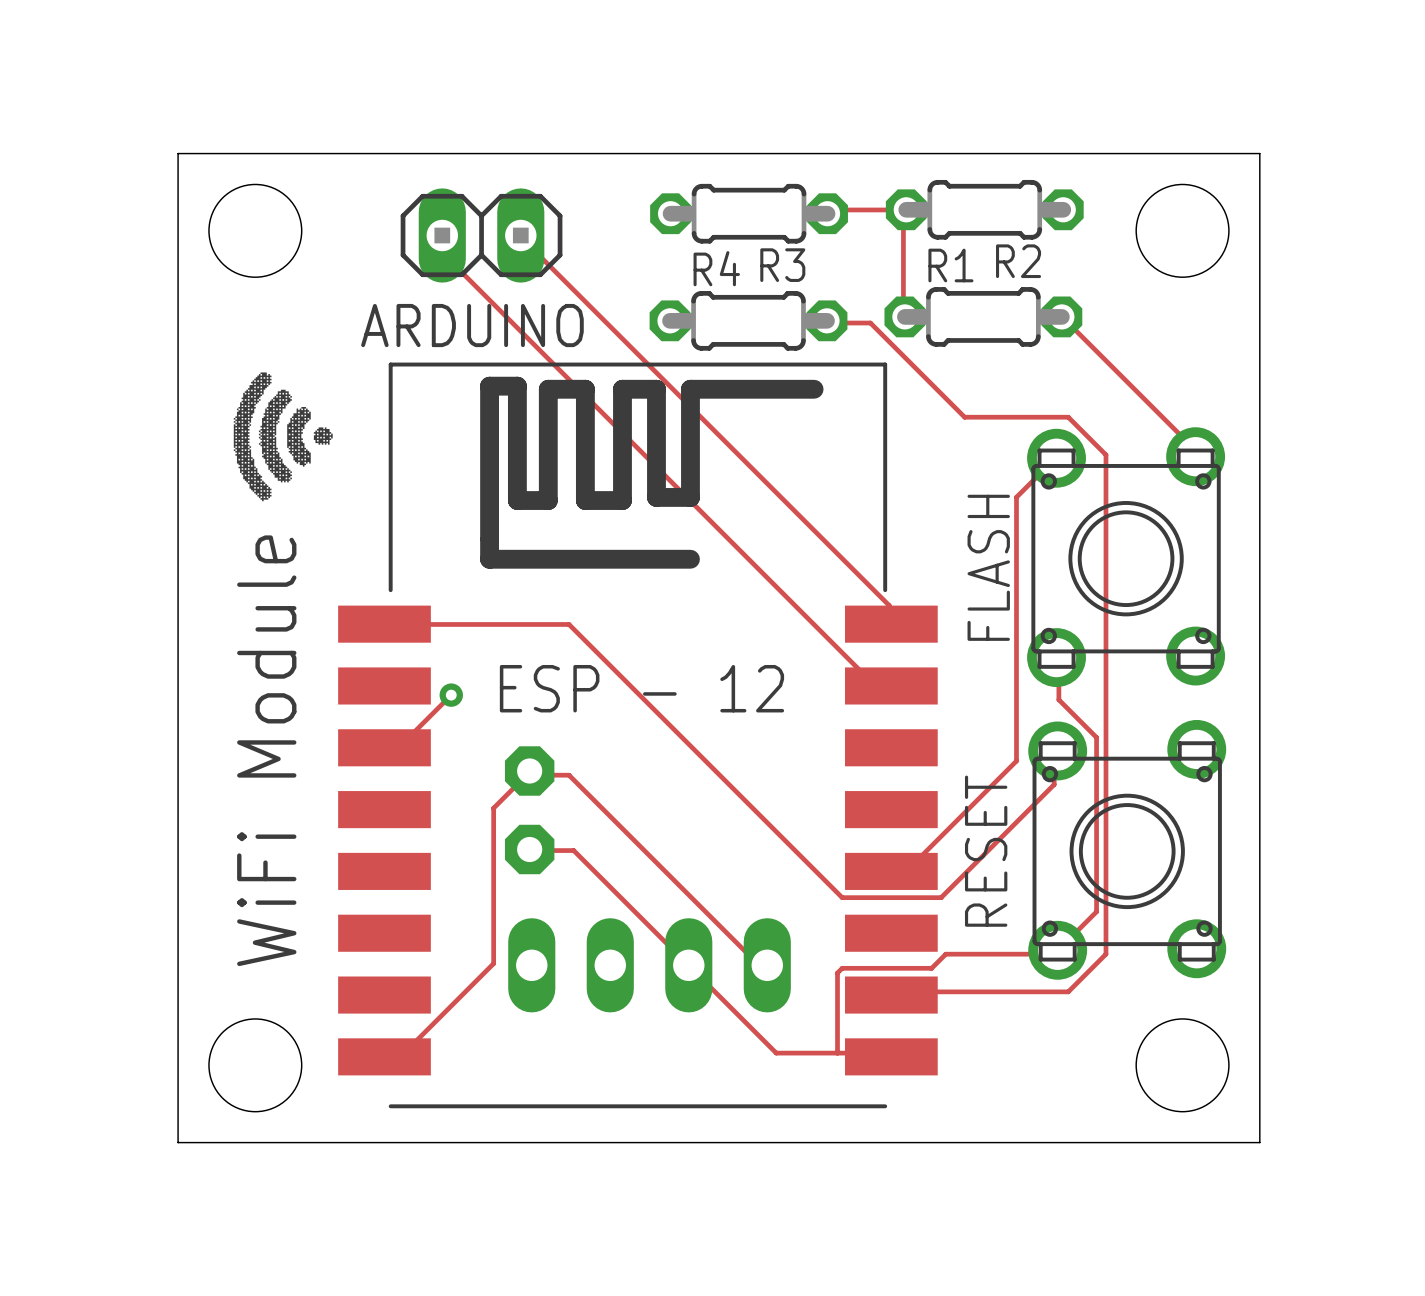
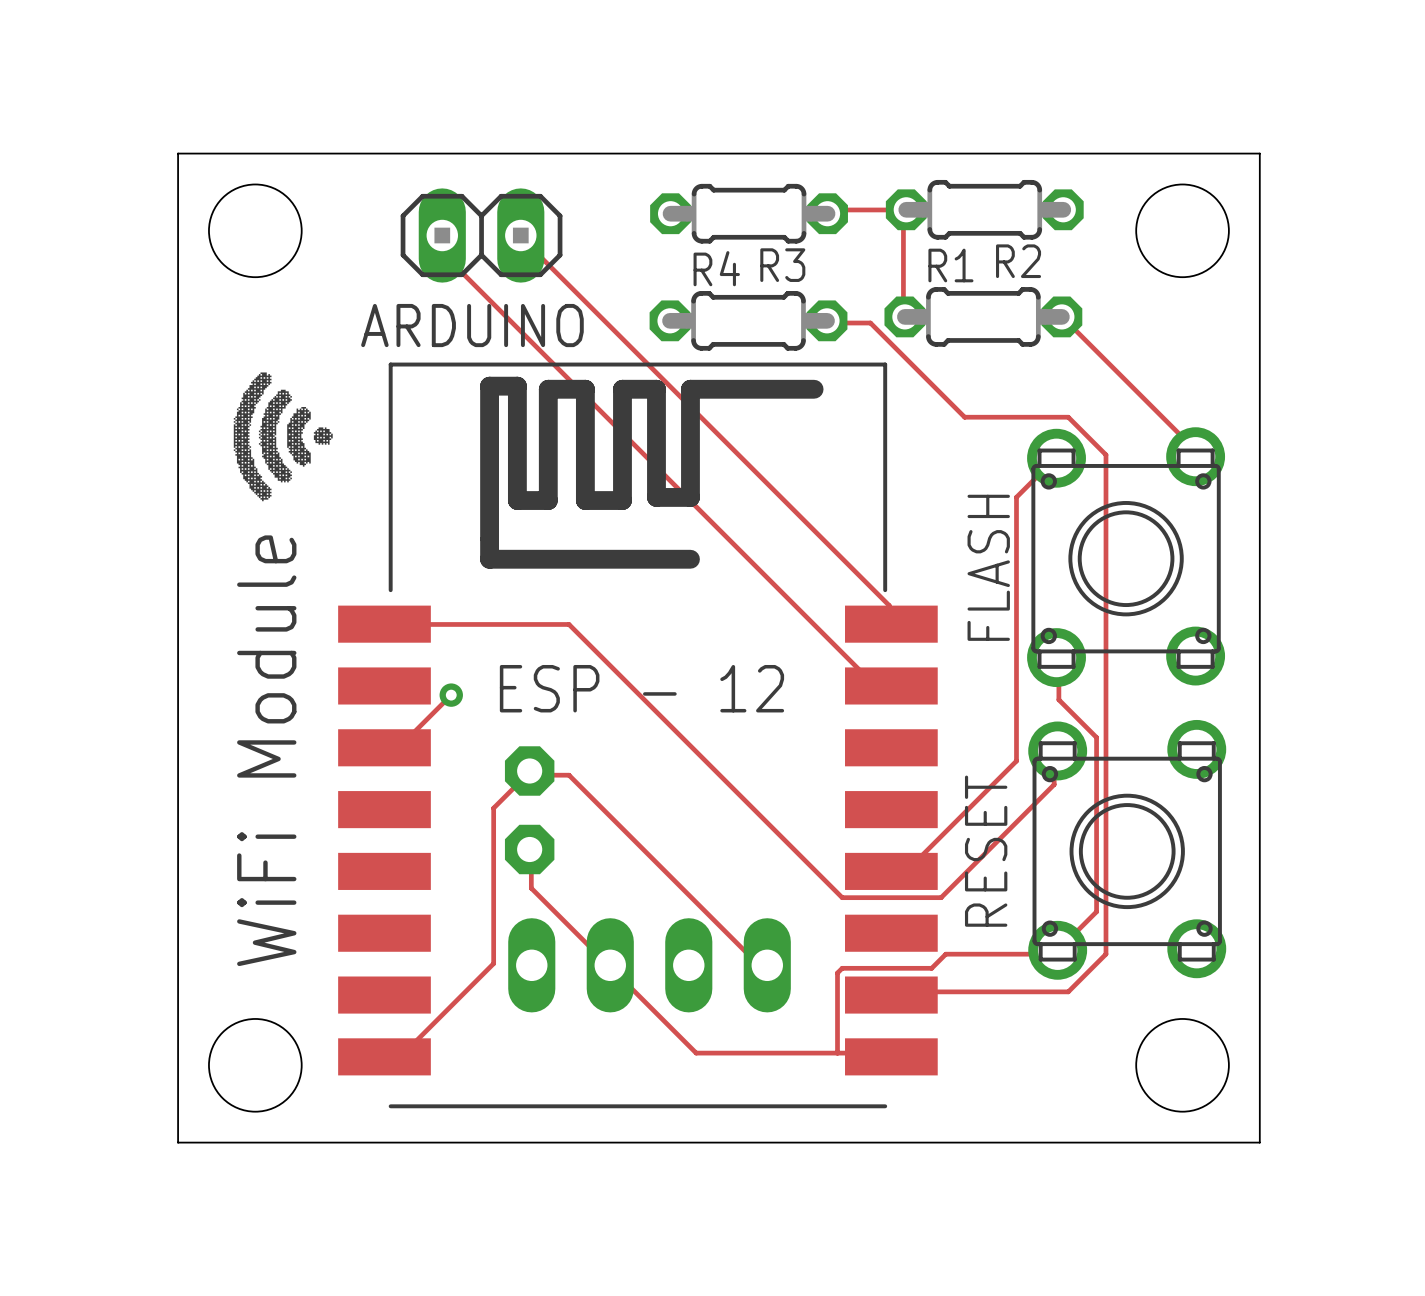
track: (531, 850) (573, 850) (776, 1053) -> (531, 850) (531, 888) (696, 1053) (776, 1053)

